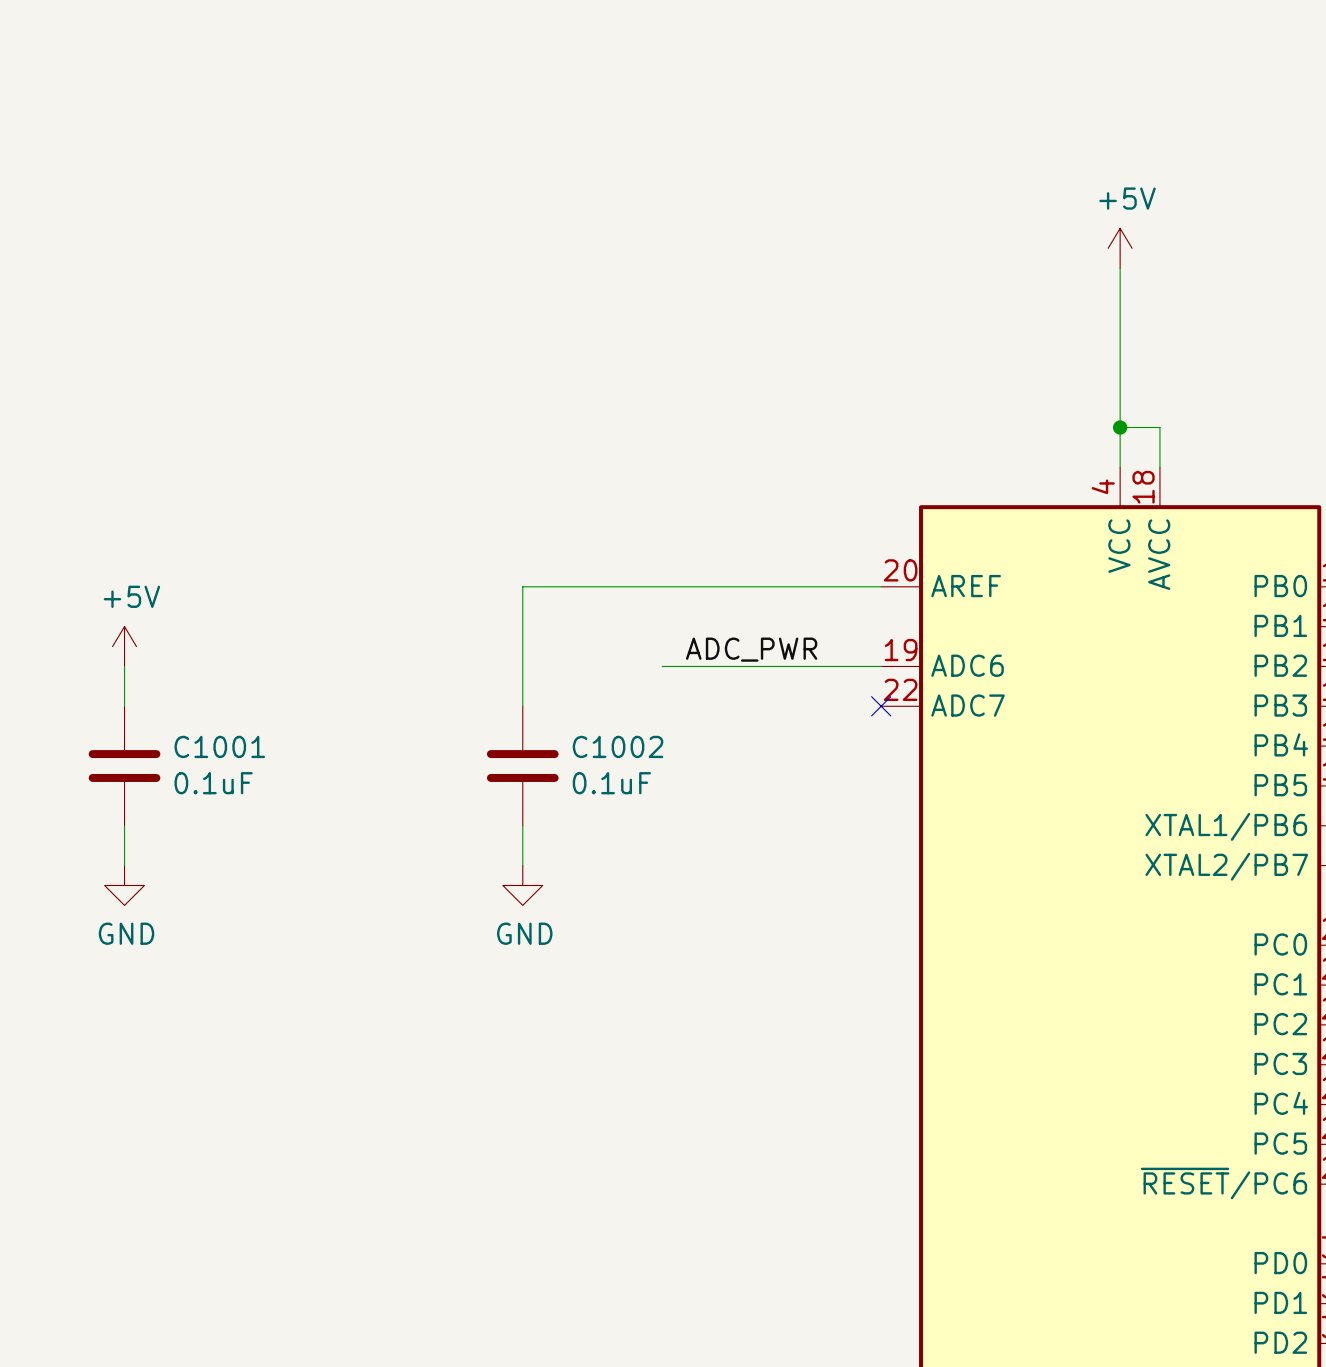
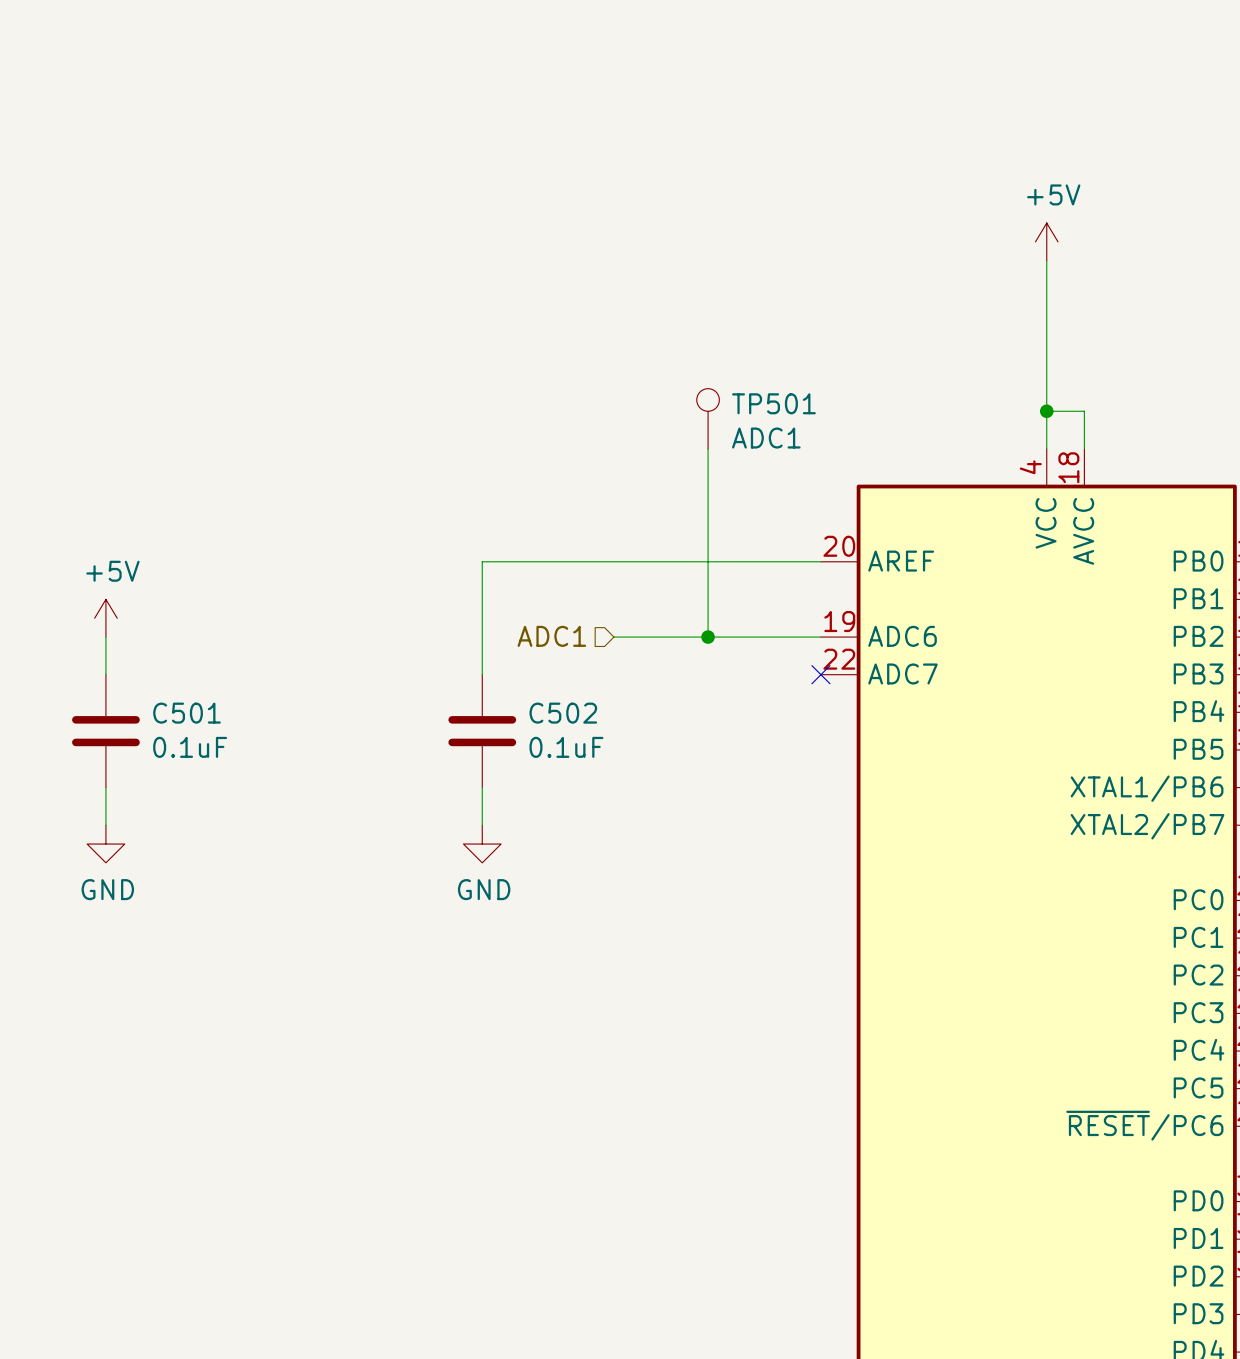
TP501: none -> ADC1 (708, 418)
wire: none -> (708, 448) (708, 637)
label: ADC_PWR (751, 649) -> none
hierarchical label: none -> ADC1 (551, 636)
junction: none -> (708, 637)
C1001 name: C1001 (219, 746) -> C501 (186, 713)
C1002 name: C1002 (618, 746) -> C502 (563, 713)

